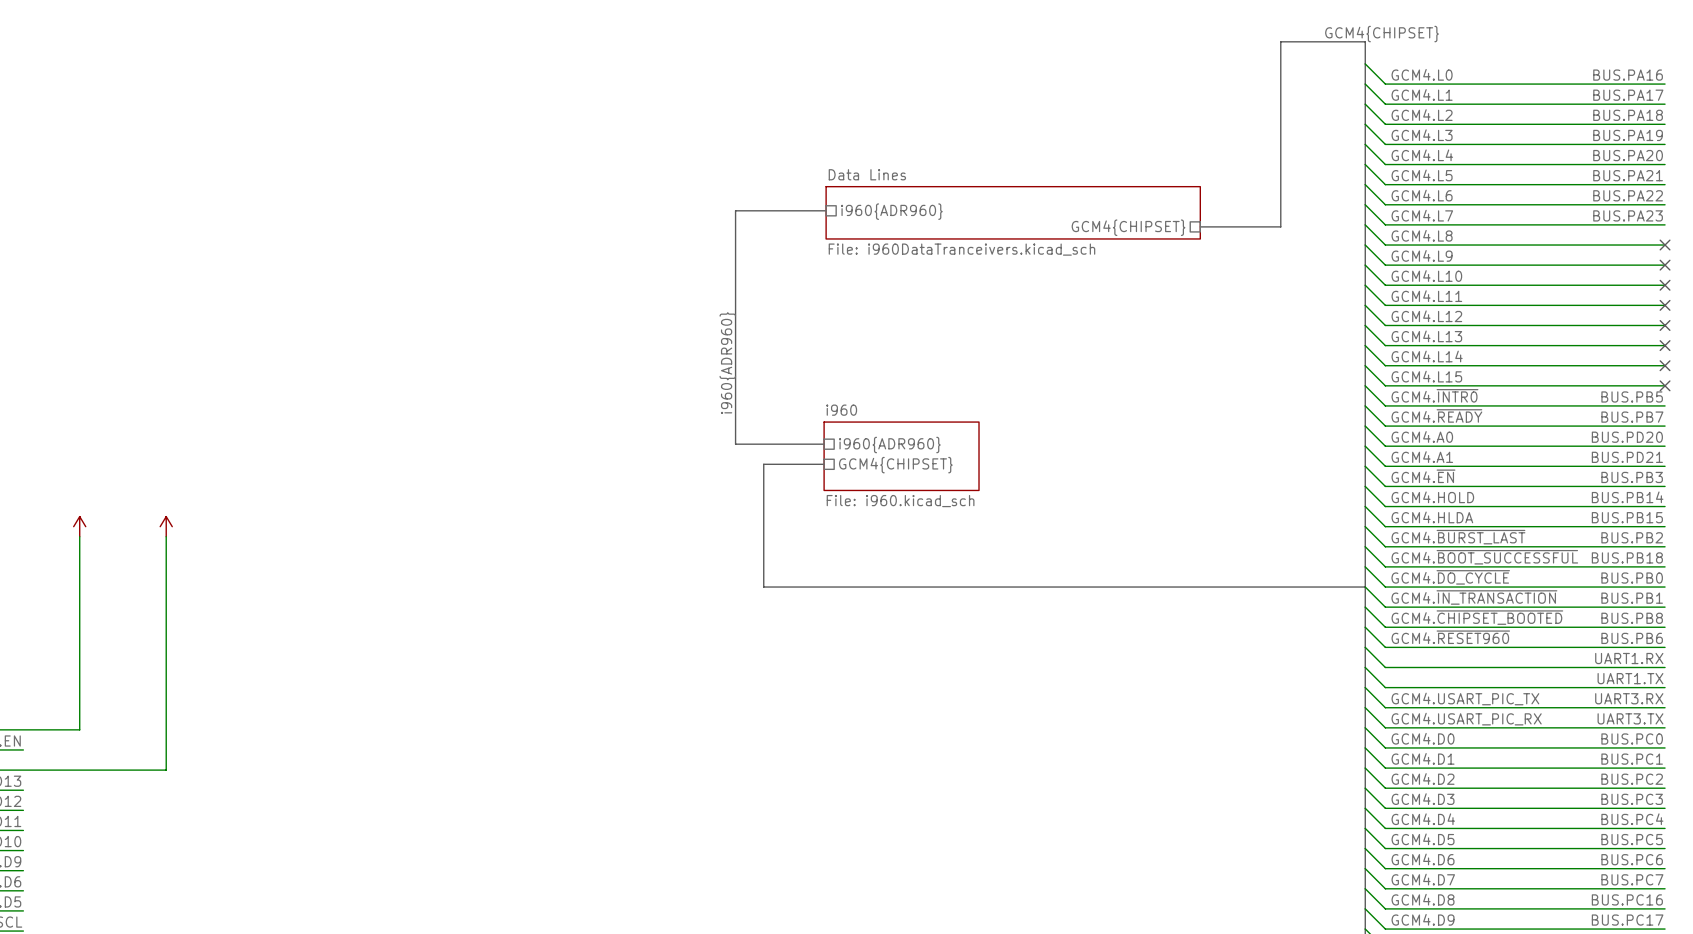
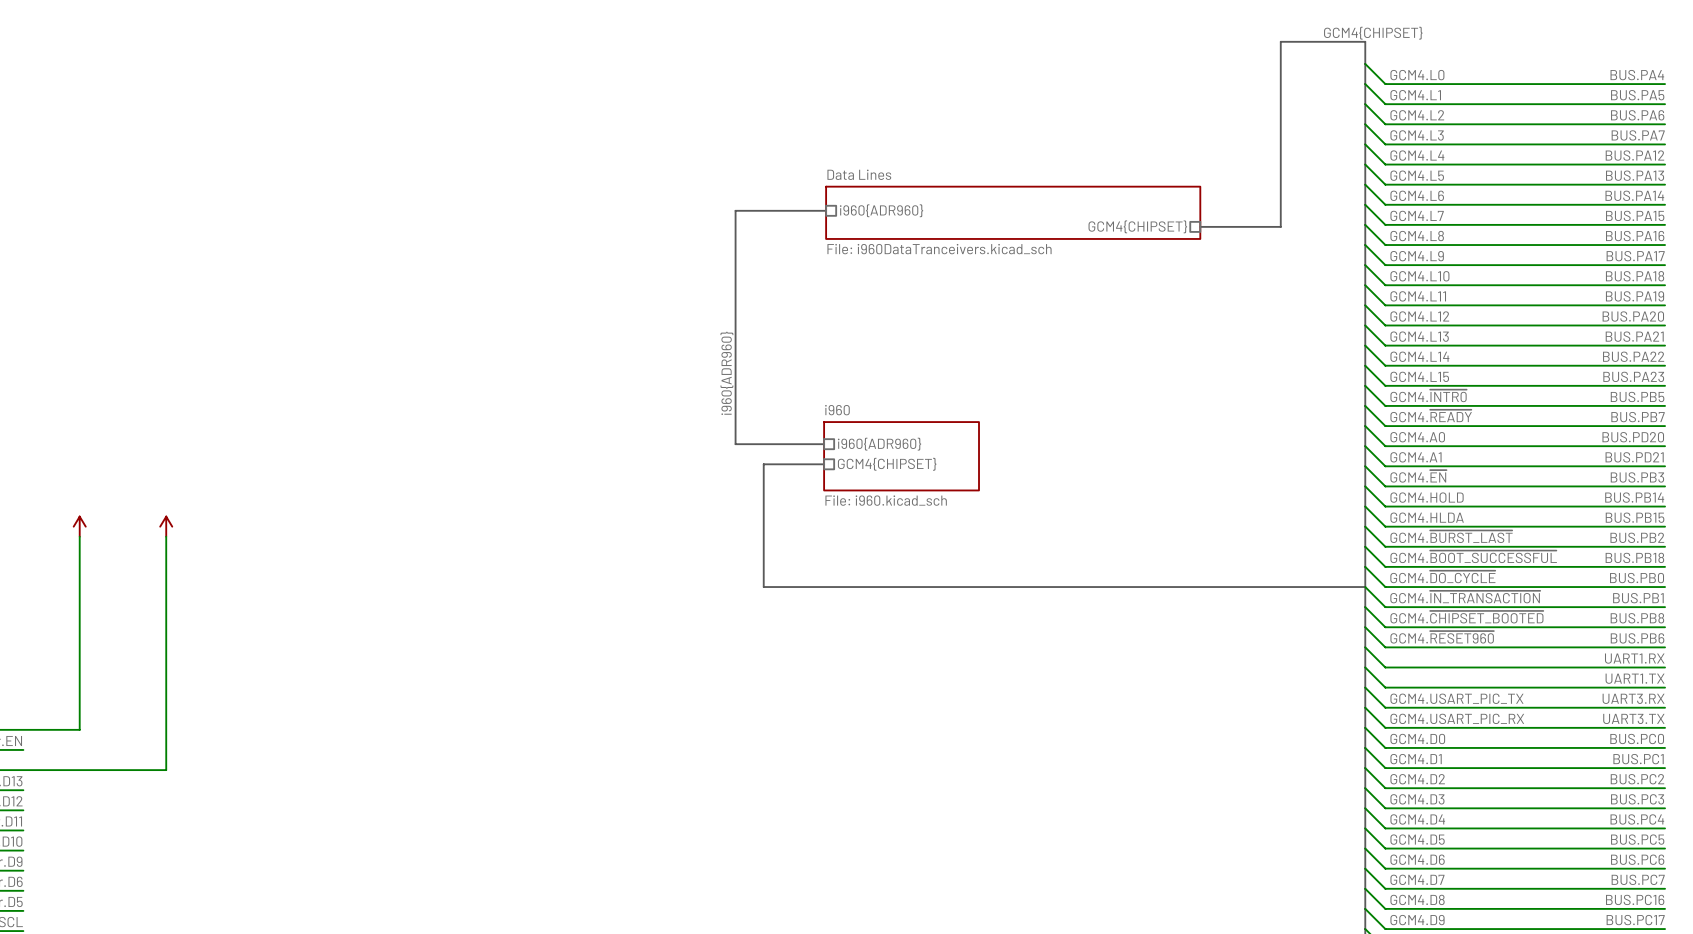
label: BUS.PA16 (1628, 75) -> BUS.PA4 (1637, 75)
label: BUS.PA17 (1628, 95) -> BUS.PA5 (1637, 95)
label: BUS.PA18 (1628, 115) -> BUS.PA6 (1637, 115)
label: BUS.PA19 (1628, 135) -> BUS.PA7 (1638, 135)
label: BUS.PA20 (1628, 155) -> BUS.PA12 (1634, 155)
label: BUS.PA21 (1628, 175) -> BUS.PA13 (1635, 175)
label: BUS.PA22 (1628, 195) -> BUS.PA14 (1634, 195)
label: BUS.PA23 (1628, 215) -> BUS.PA15 (1635, 215)
label: none -> BUS.PA16 (1635, 236)
no-connect mark: (1665, 245) -> none
label: none -> BUS.PA17 (1635, 256)
no-connect mark: (1665, 265) -> none
label: none -> BUS.PA18 (1635, 276)
no-connect mark: (1665, 285) -> none
label: none -> BUS.PA19 (1635, 296)
no-connect mark: (1665, 305) -> none
label: none -> BUS.PA20 (1633, 316)
no-connect mark: (1665, 325) -> none
label: none -> BUS.PA21 (1634, 336)
no-connect mark: (1665, 345) -> none
label: none -> BUS.PA22 (1633, 356)
no-connect mark: (1665, 365) -> none
label: none -> BUS.PA23 (1633, 376)
no-connect mark: (1665, 385) -> none

